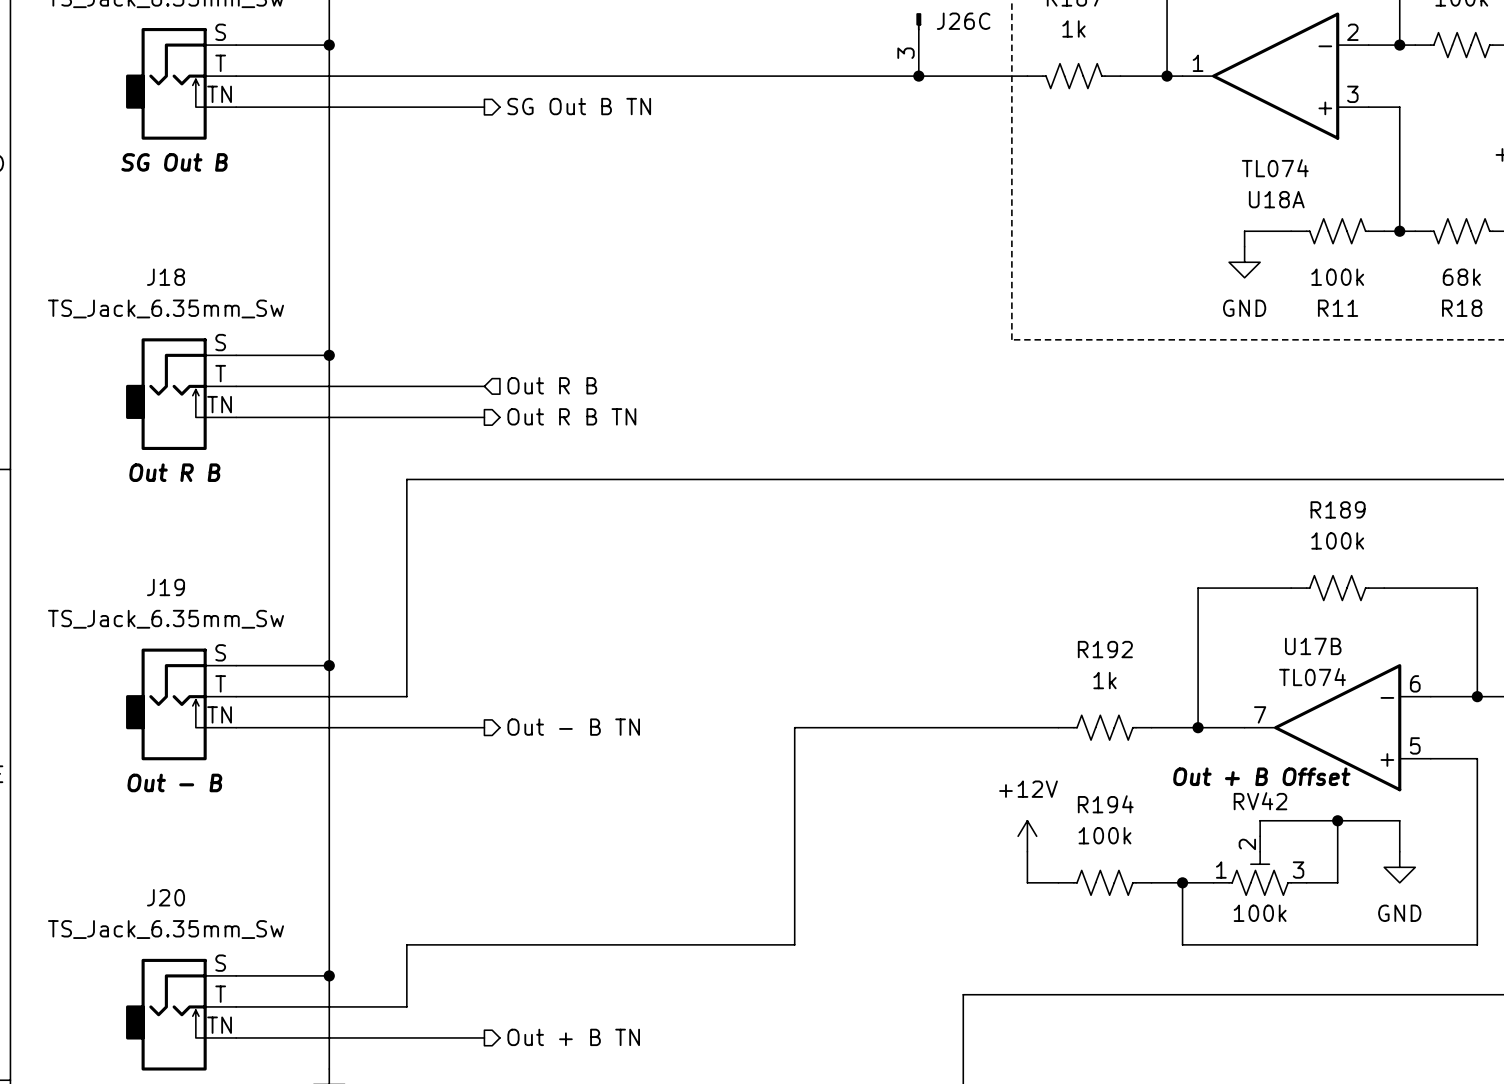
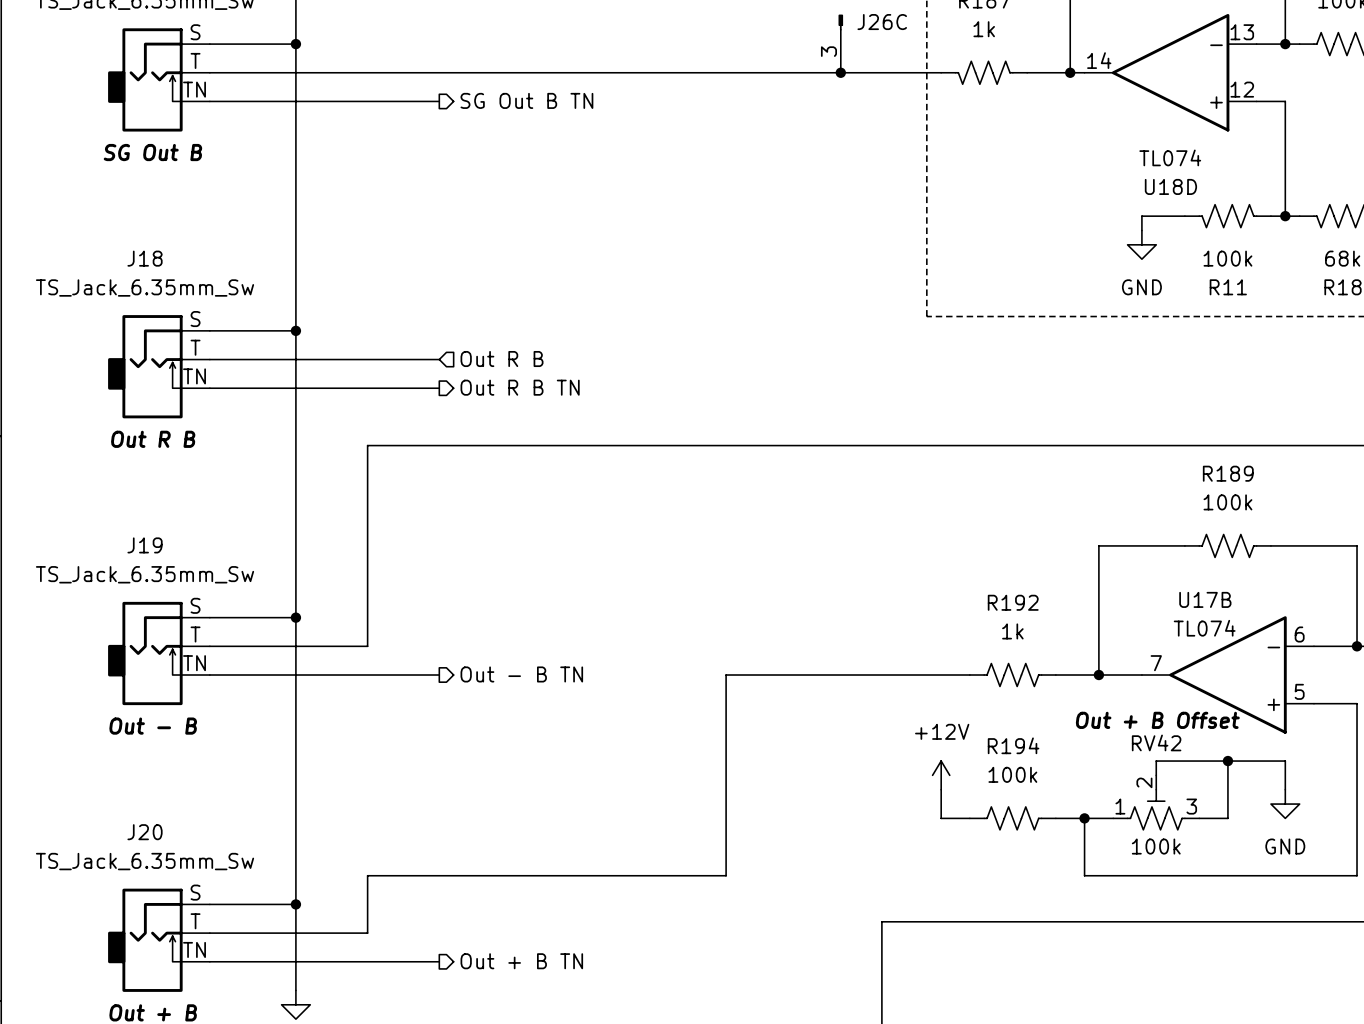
U18A pin number: 2 (1352, 32) -> 13 (1242, 32)
U18A pin number: 1 (1198, 63) -> 14 (1099, 60)
U18A pin number: 3 (1352, 94) -> 12 (1242, 89)
U18A name: U18A (1276, 199) -> U18D (1170, 186)

